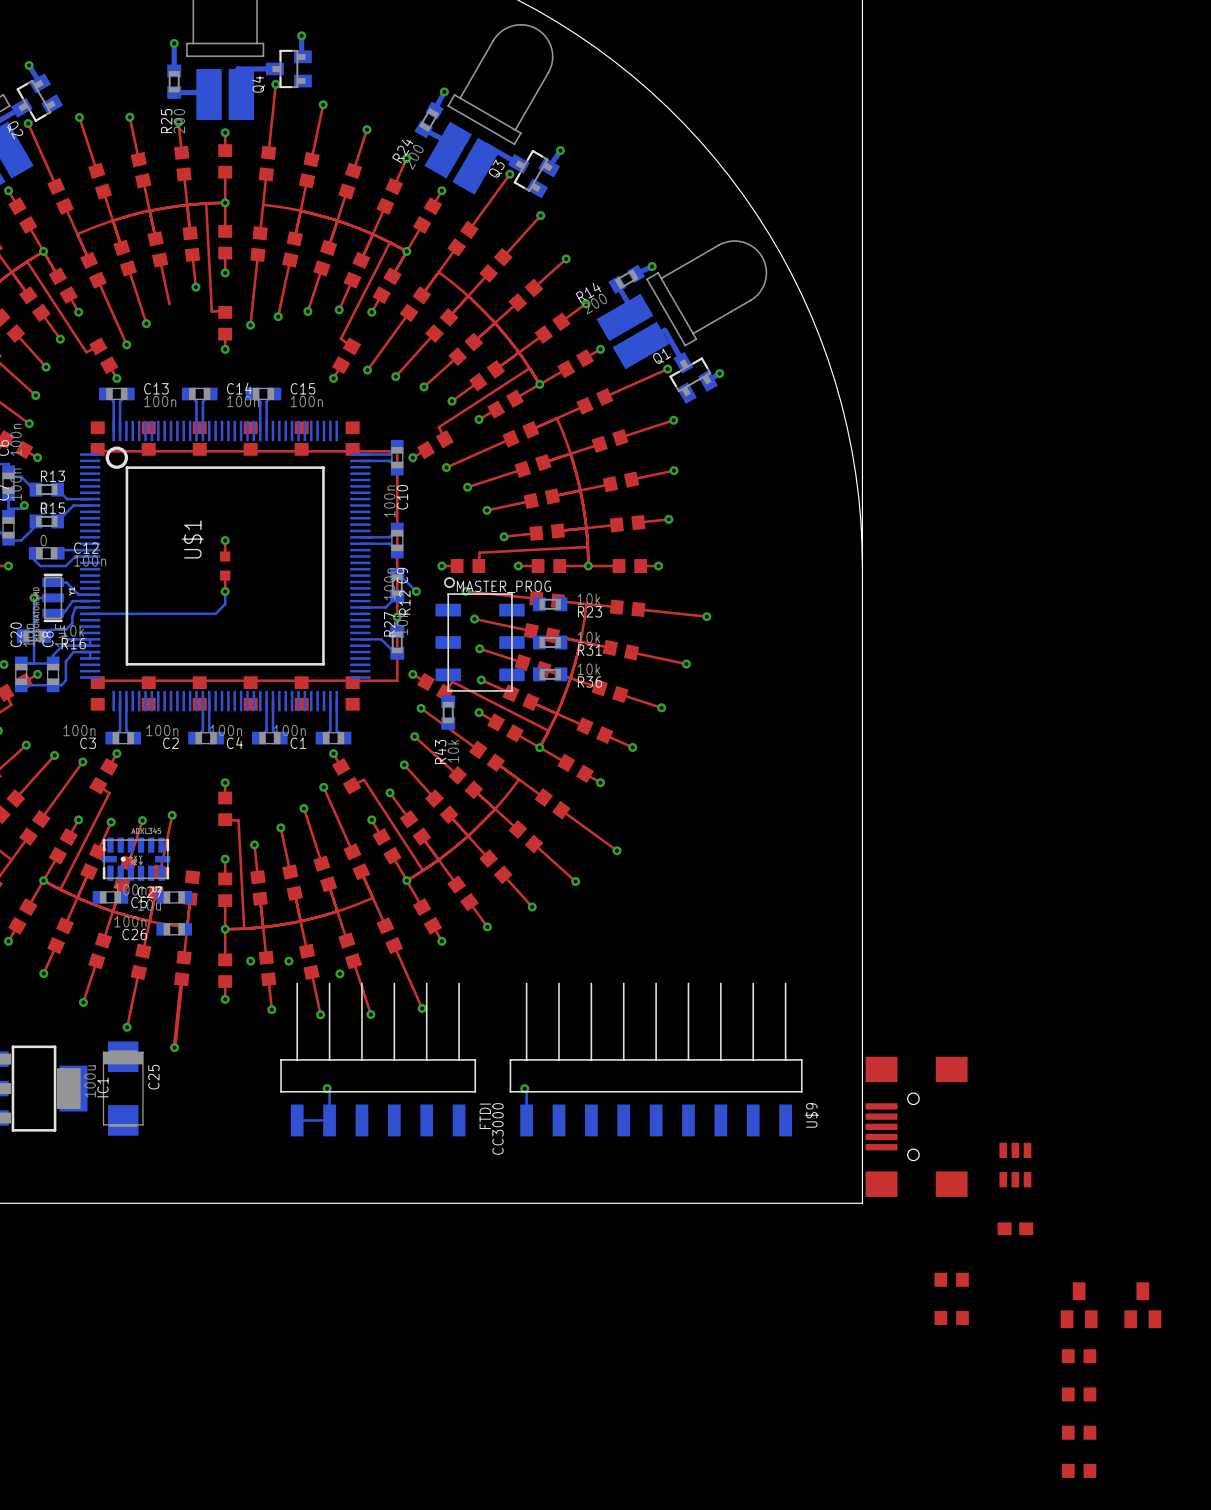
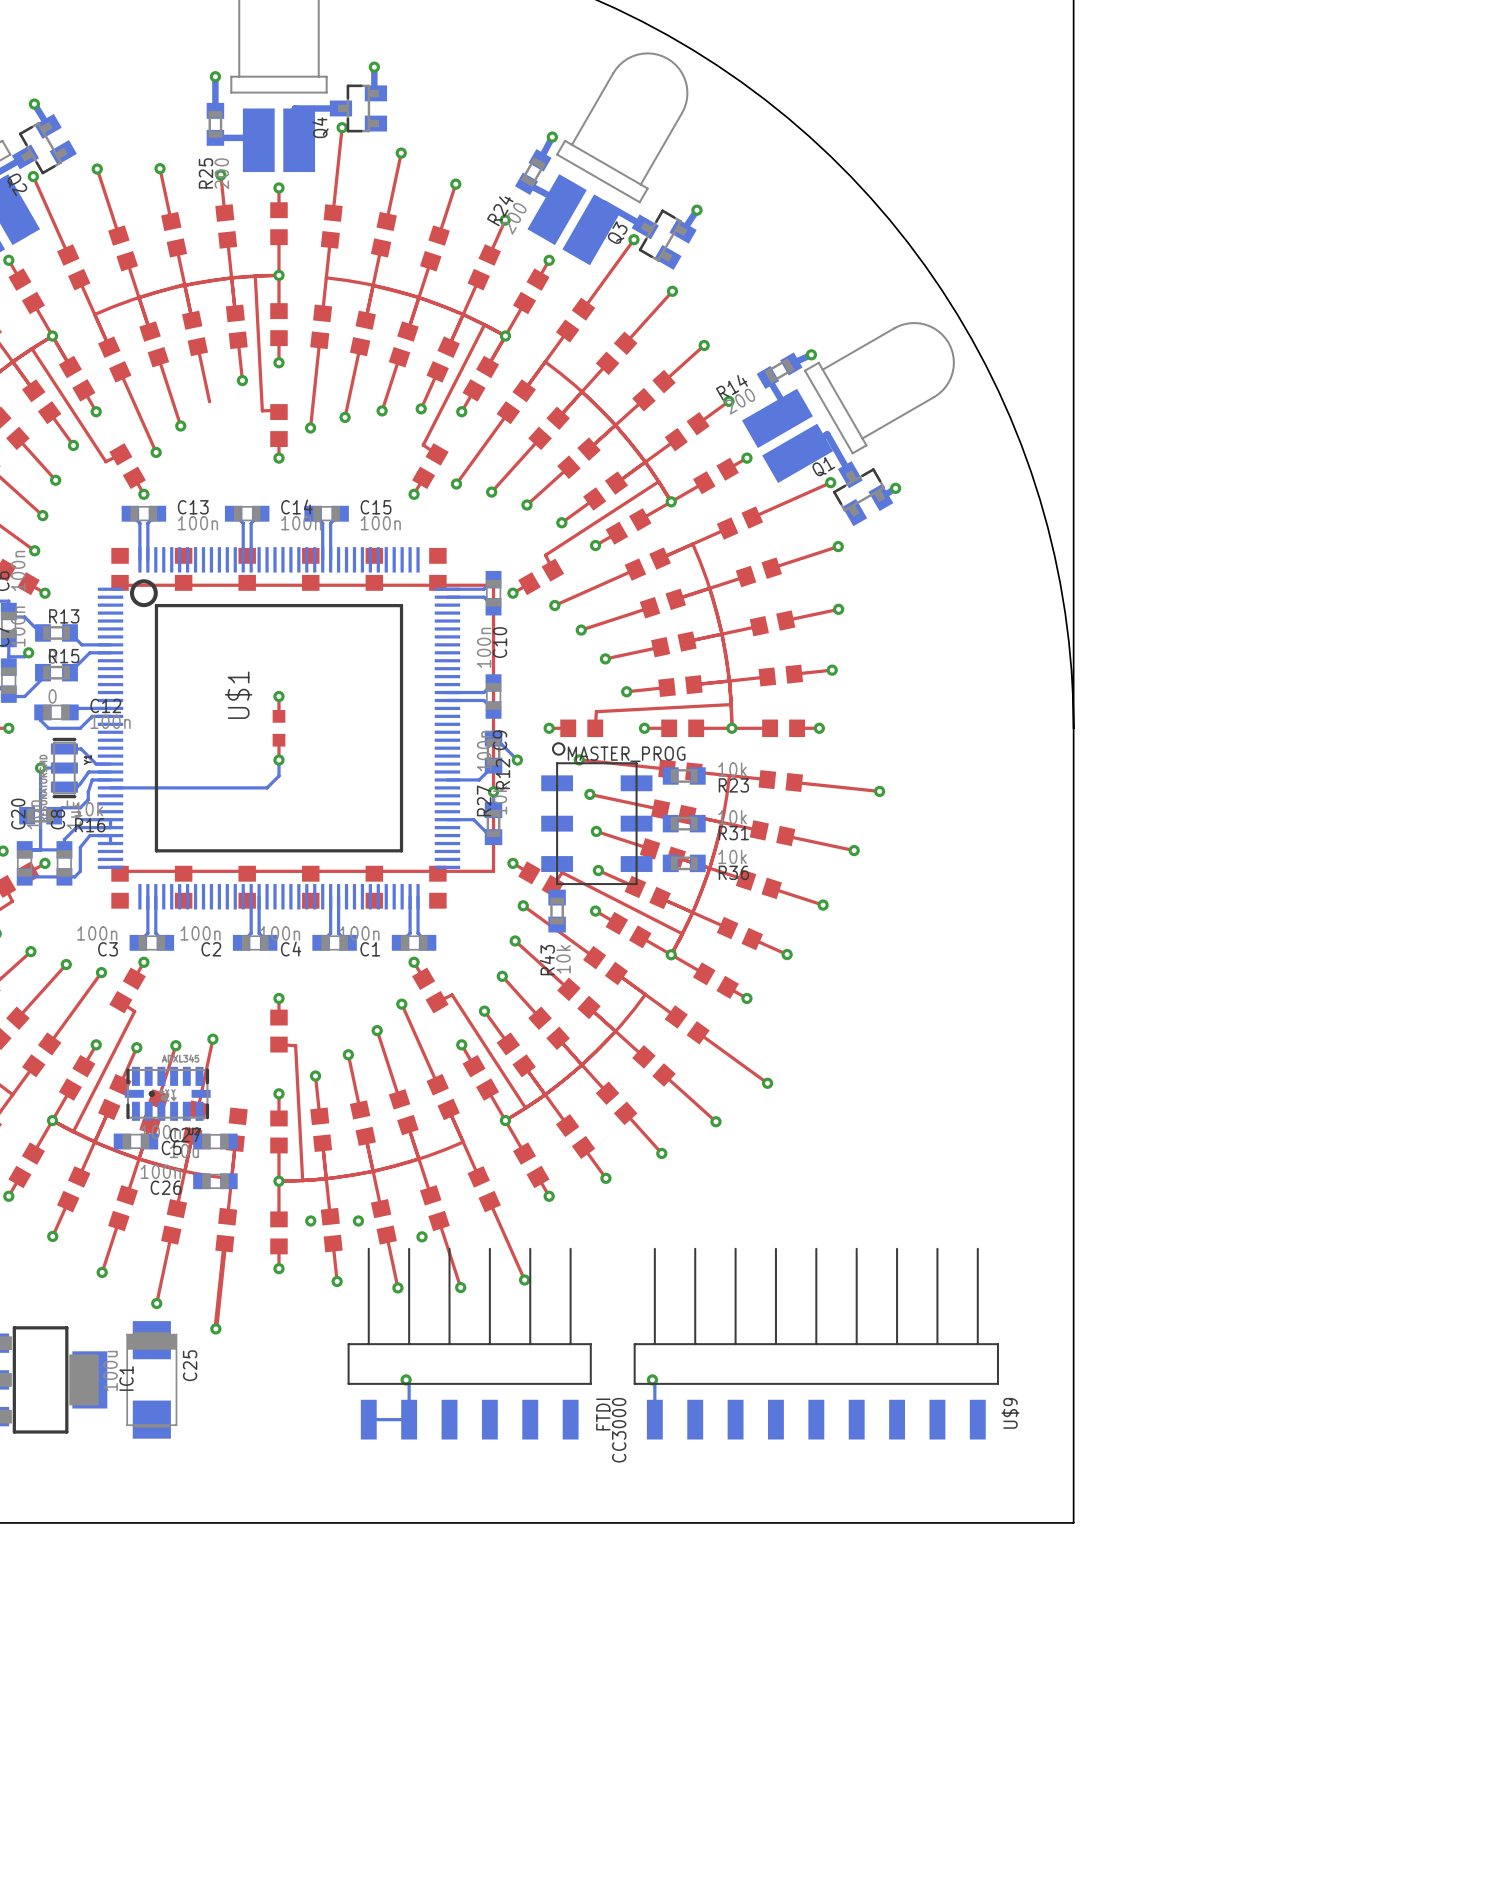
part: (916, 1126) -> none
part: (1015, 1165) -> none
part: (1015, 1228) -> none
part: (951, 1279) -> none
part: (1079, 1305) -> none
part: (1142, 1305) -> none
part: (951, 1317) -> none
part: (1079, 1356) -> none
part: (1079, 1394) -> none
part: (1079, 1432) -> none
part: (1079, 1470) -> none

